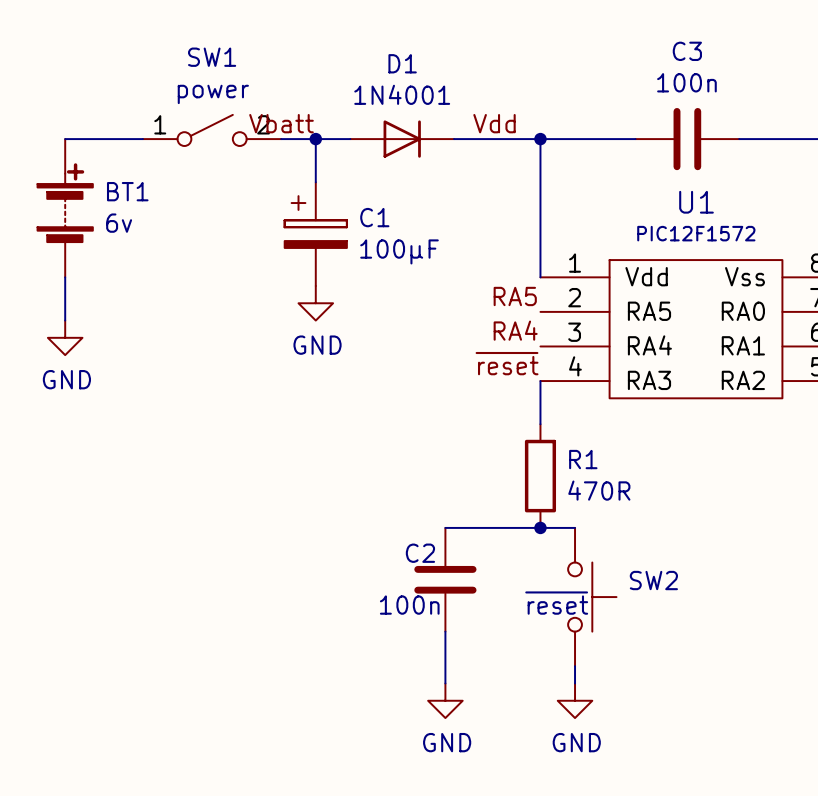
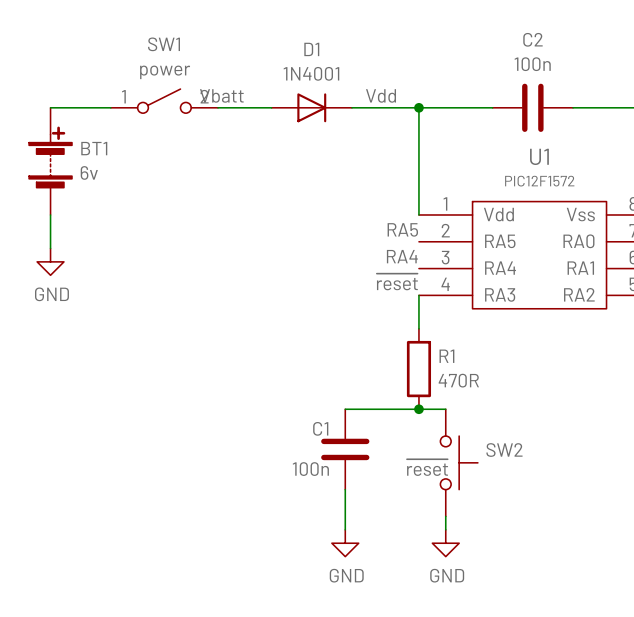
C3 name: C3 (687, 51) -> C2 (532, 39)
wire: (315, 139) (315, 182) -> none
junction: (315, 139) -> none
C1: 100µF (315, 234) -> none
power symbol: GND (315, 303) -> none
C2 name: C2 (420, 553) -> C1 (320, 428)

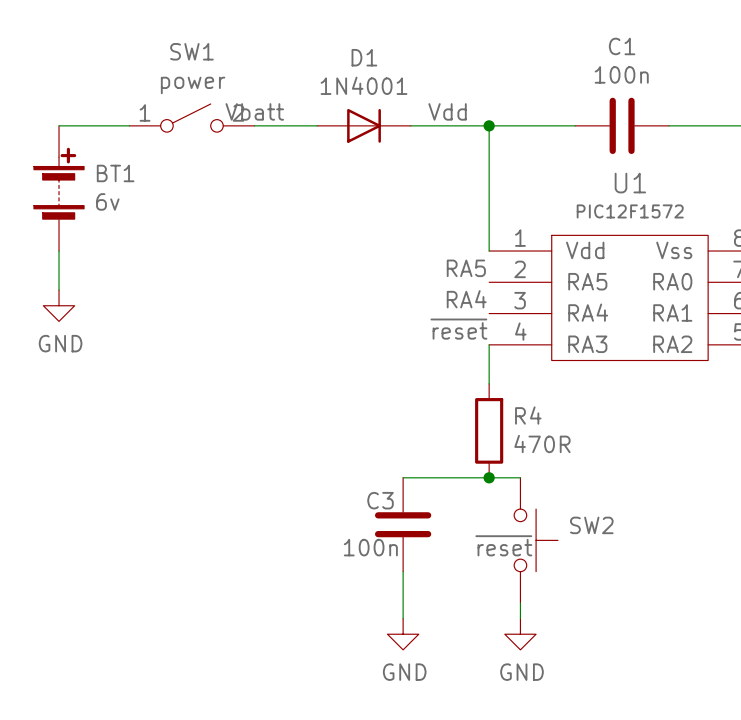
C2 name: C2 (532, 39) -> C1 (622, 46)
R1 name: R1 (446, 356) -> R4 (528, 415)
C1 name: C1 (320, 428) -> C3 (380, 500)

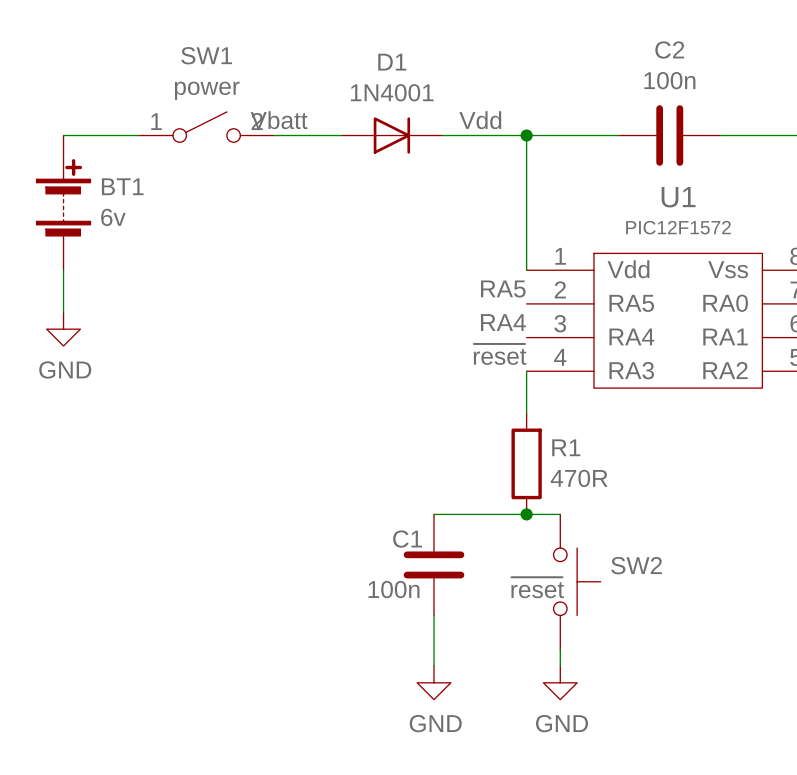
C1 name: C1 (622, 46) -> C2 (669, 50)
R4 name: R4 (528, 415) -> R1 (566, 447)
C3 name: C3 (380, 500) -> C1 (407, 539)

